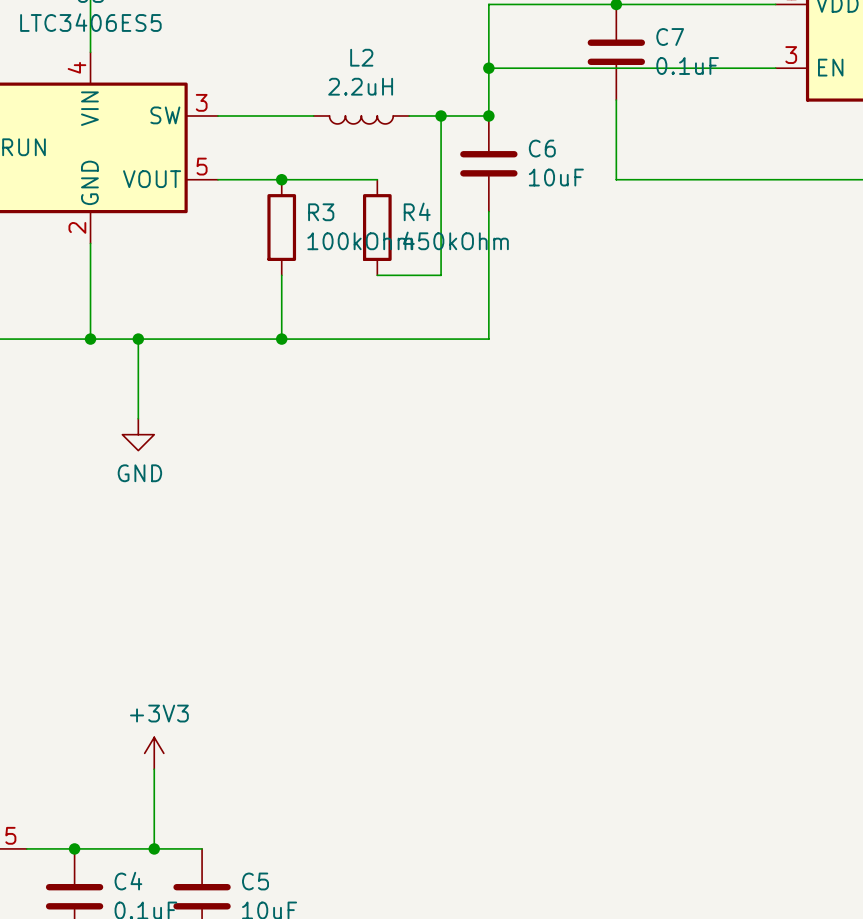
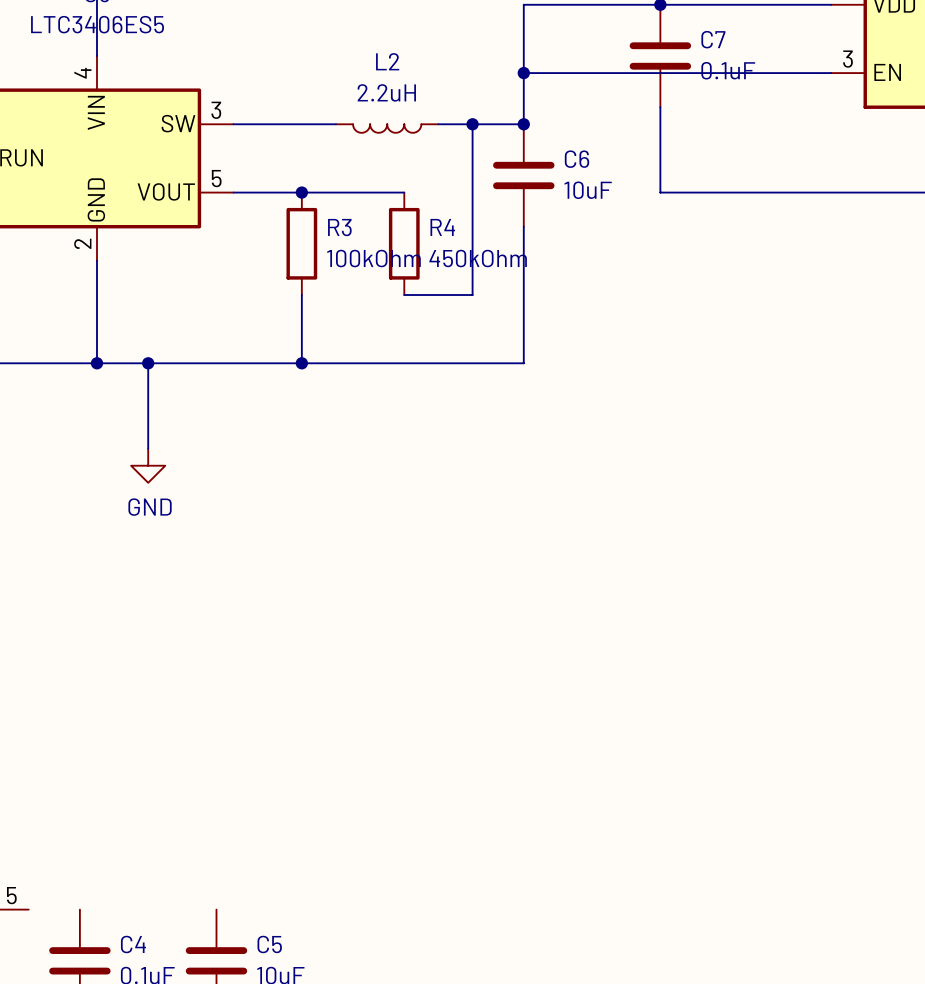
power symbol: +3V3 (154, 753) -> none
wire: (154, 769) (154, 848) -> none
wire: (26, 848) (202, 848) -> none
junction: (74, 848) -> none
junction: (154, 848) -> none

